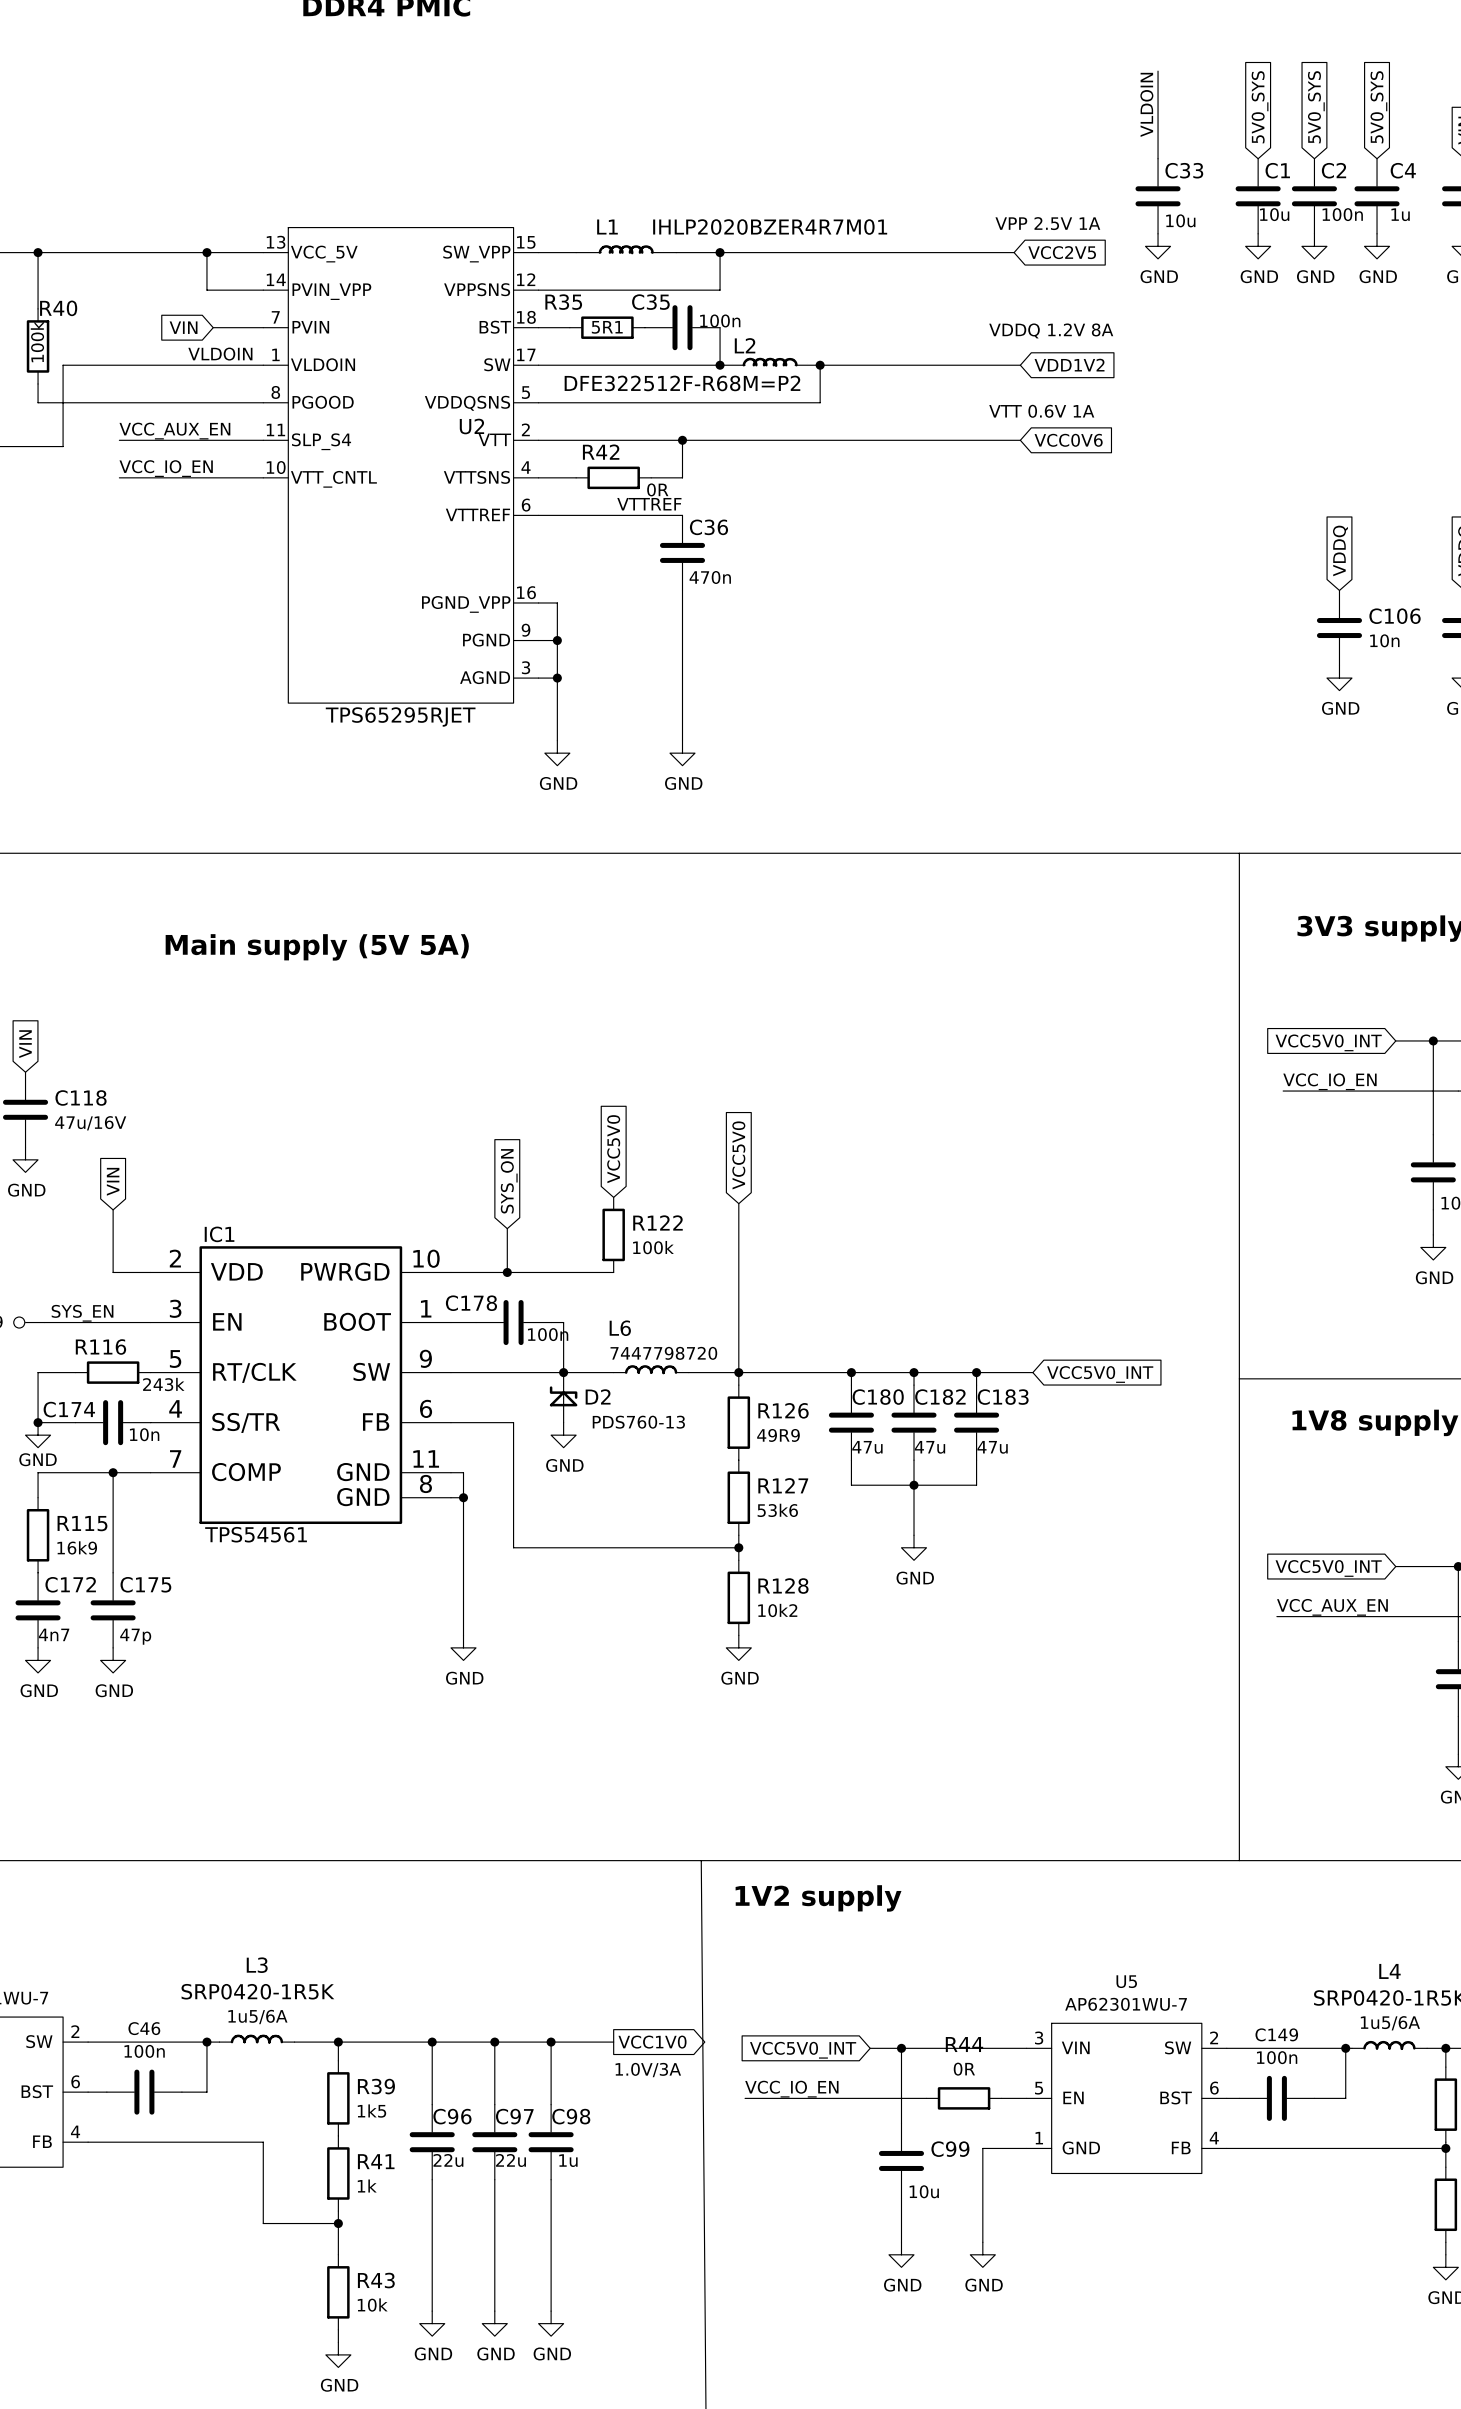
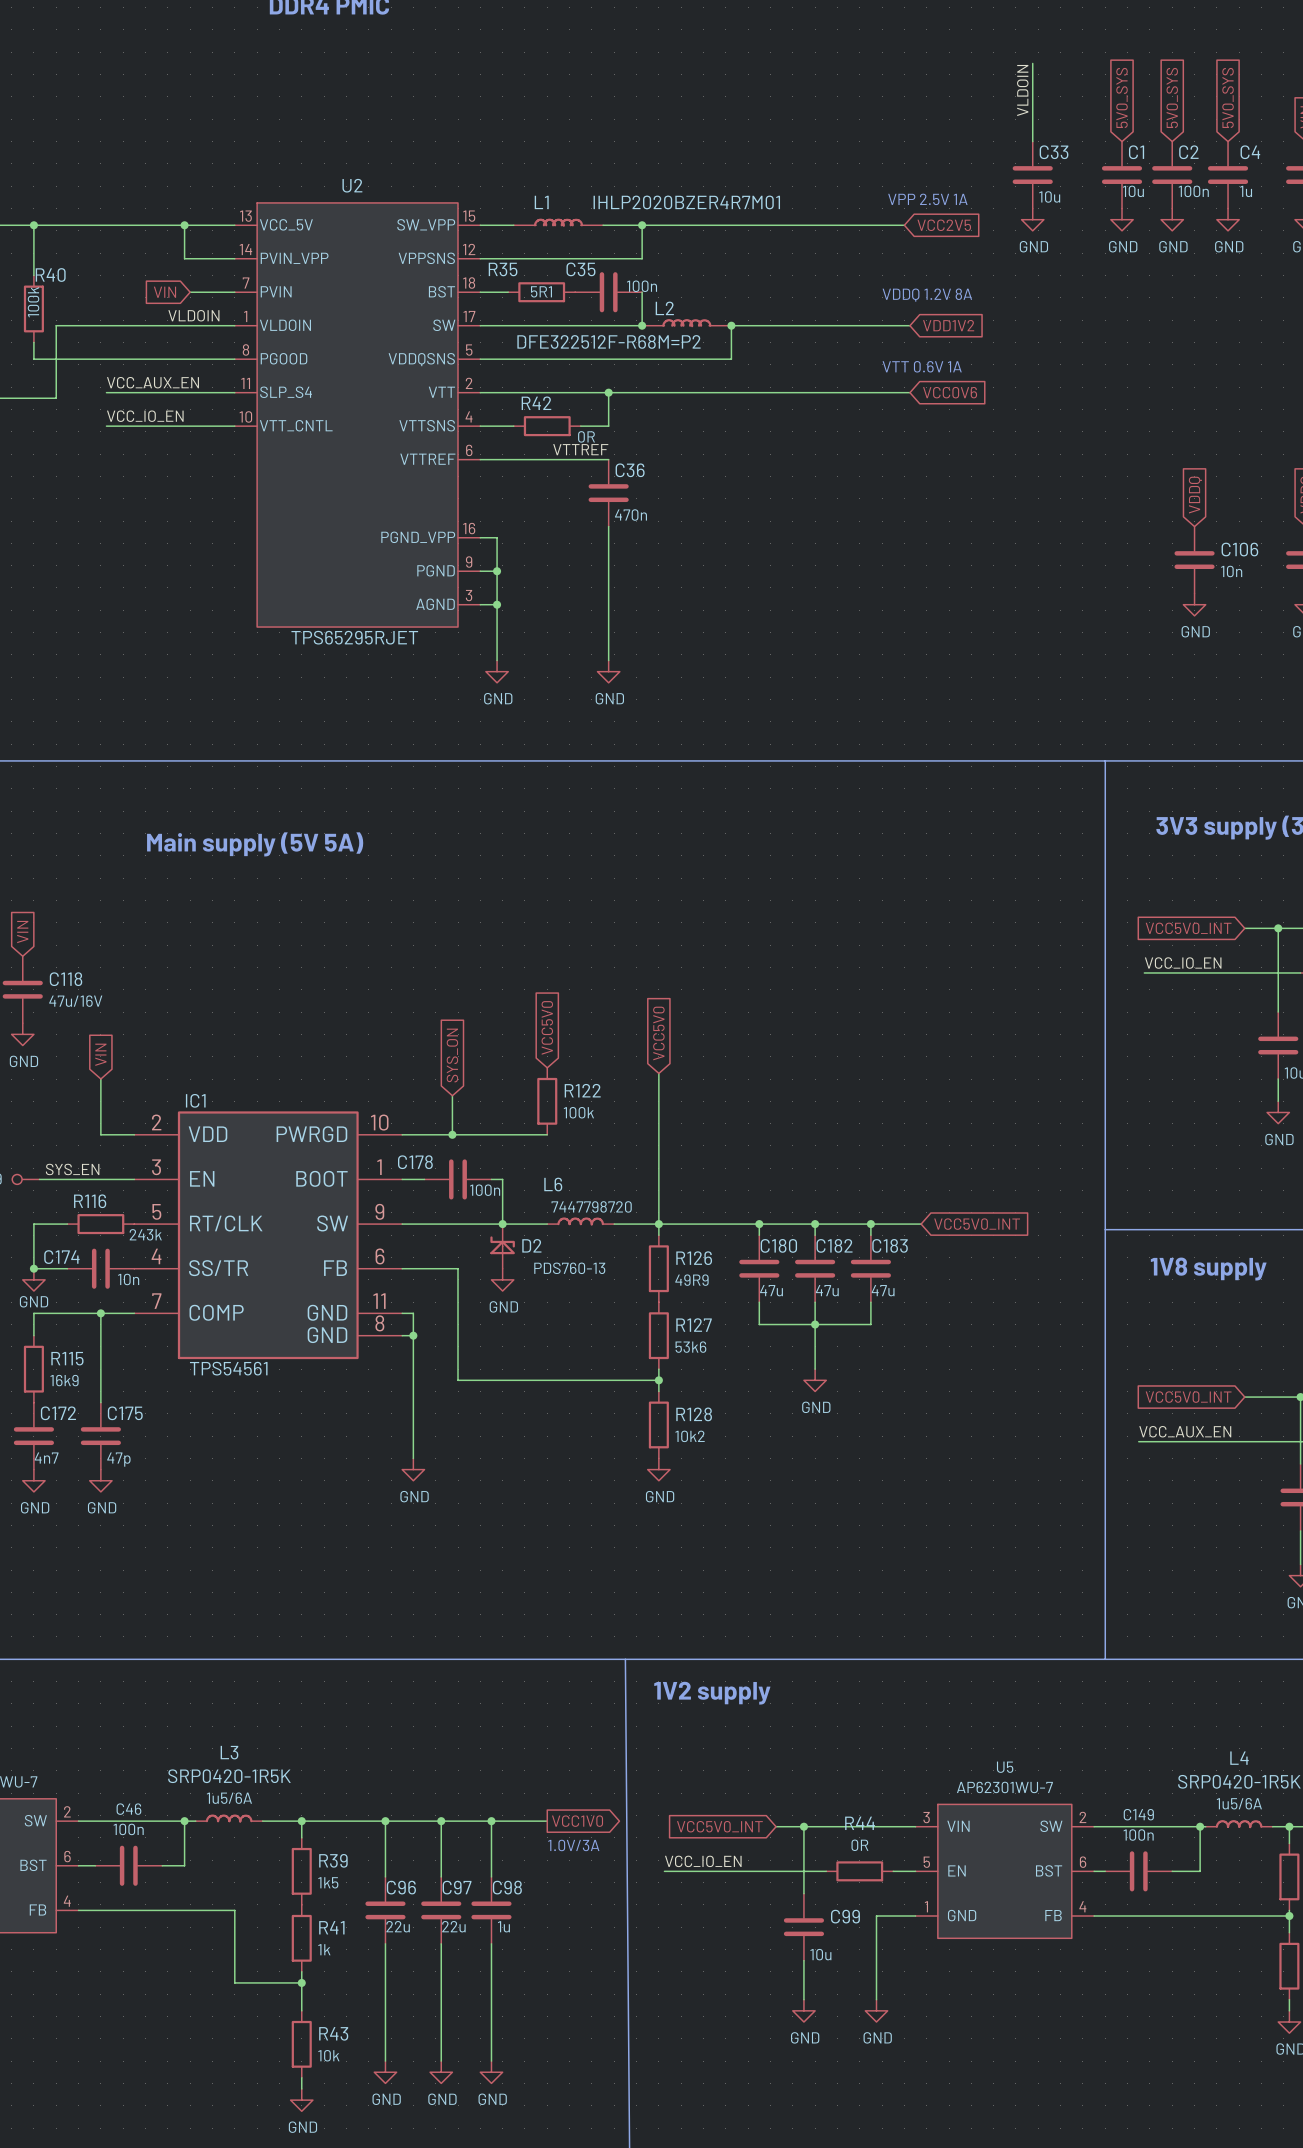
U2 name position: U2 (471, 426) -> U2 (352, 185)

